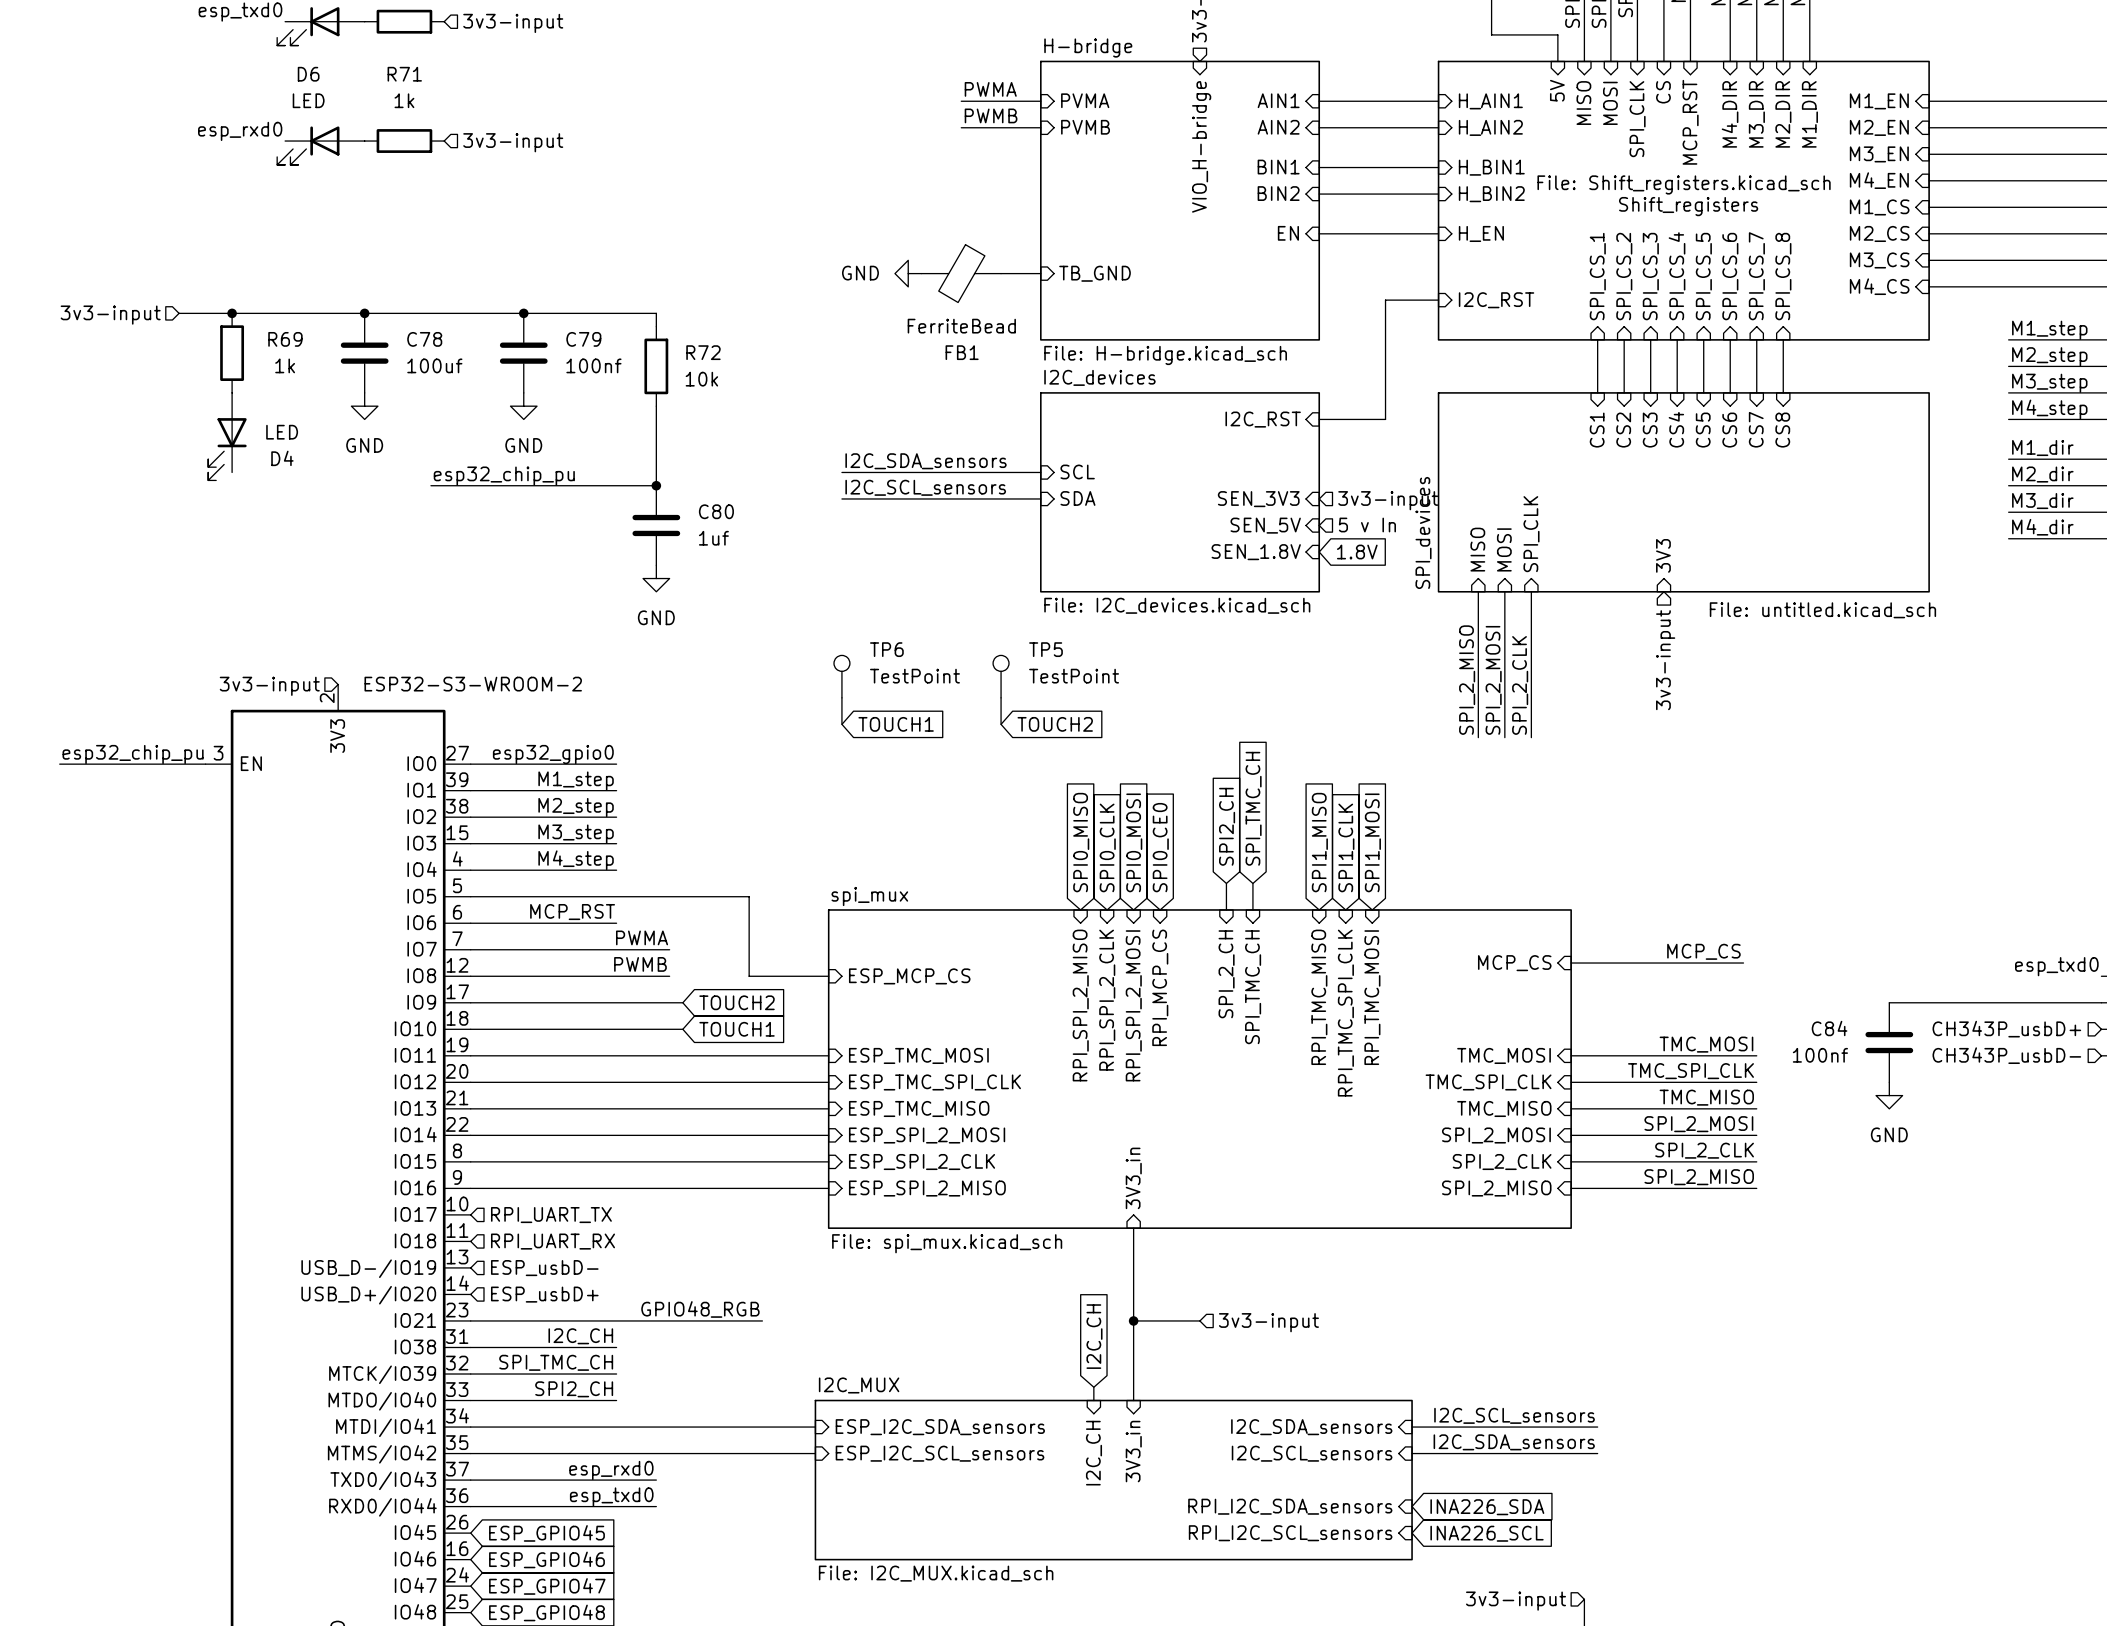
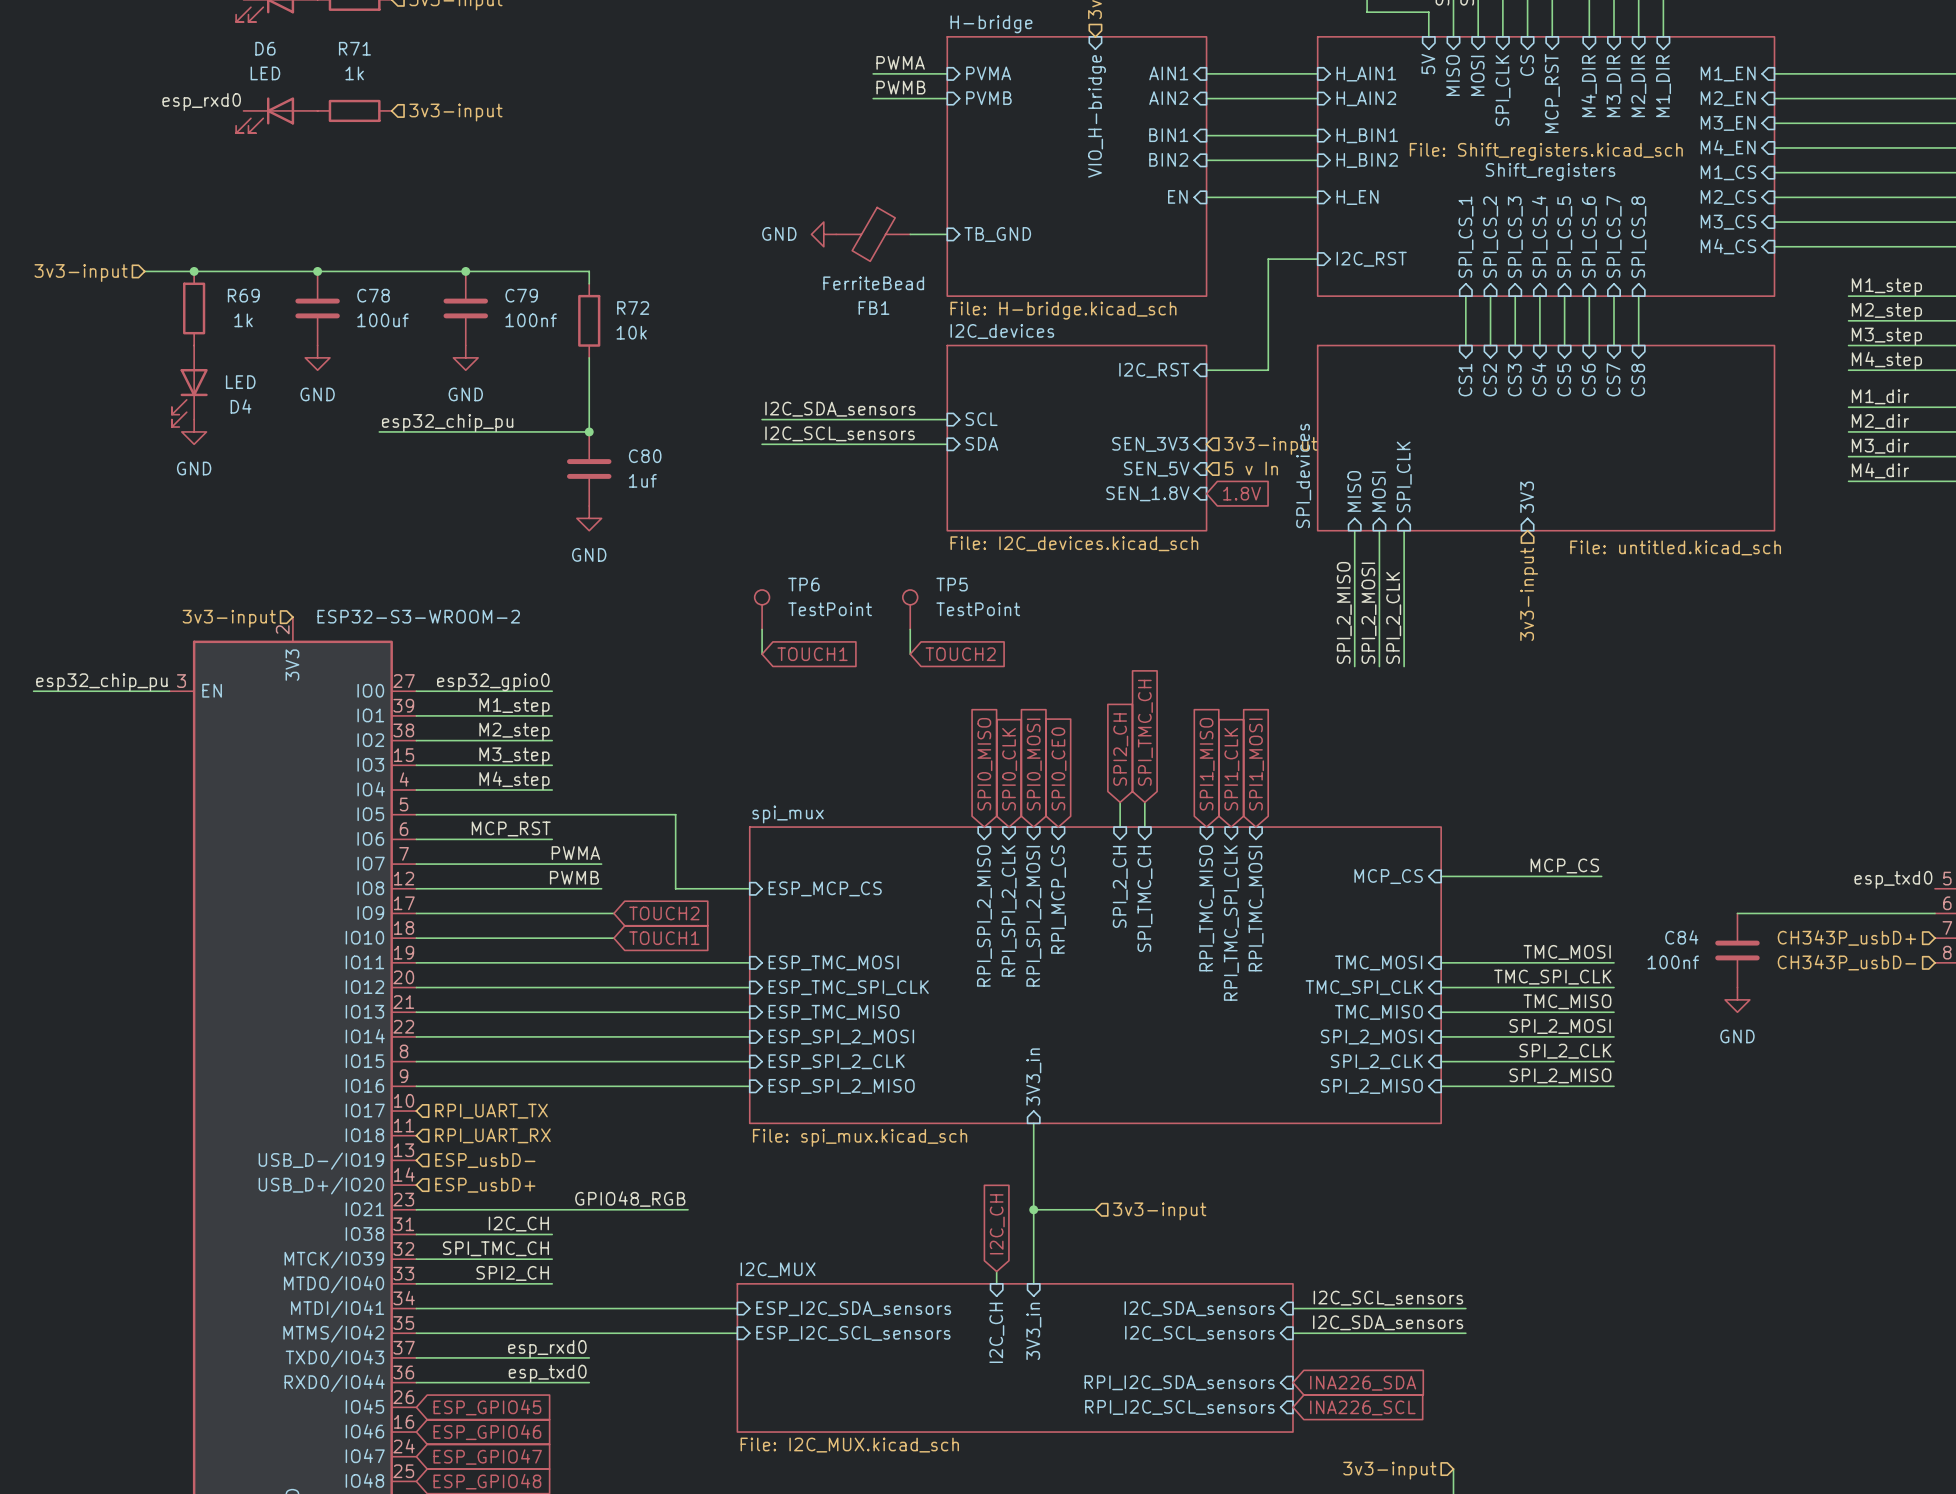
power symbol: none -> GND (194, 431)

